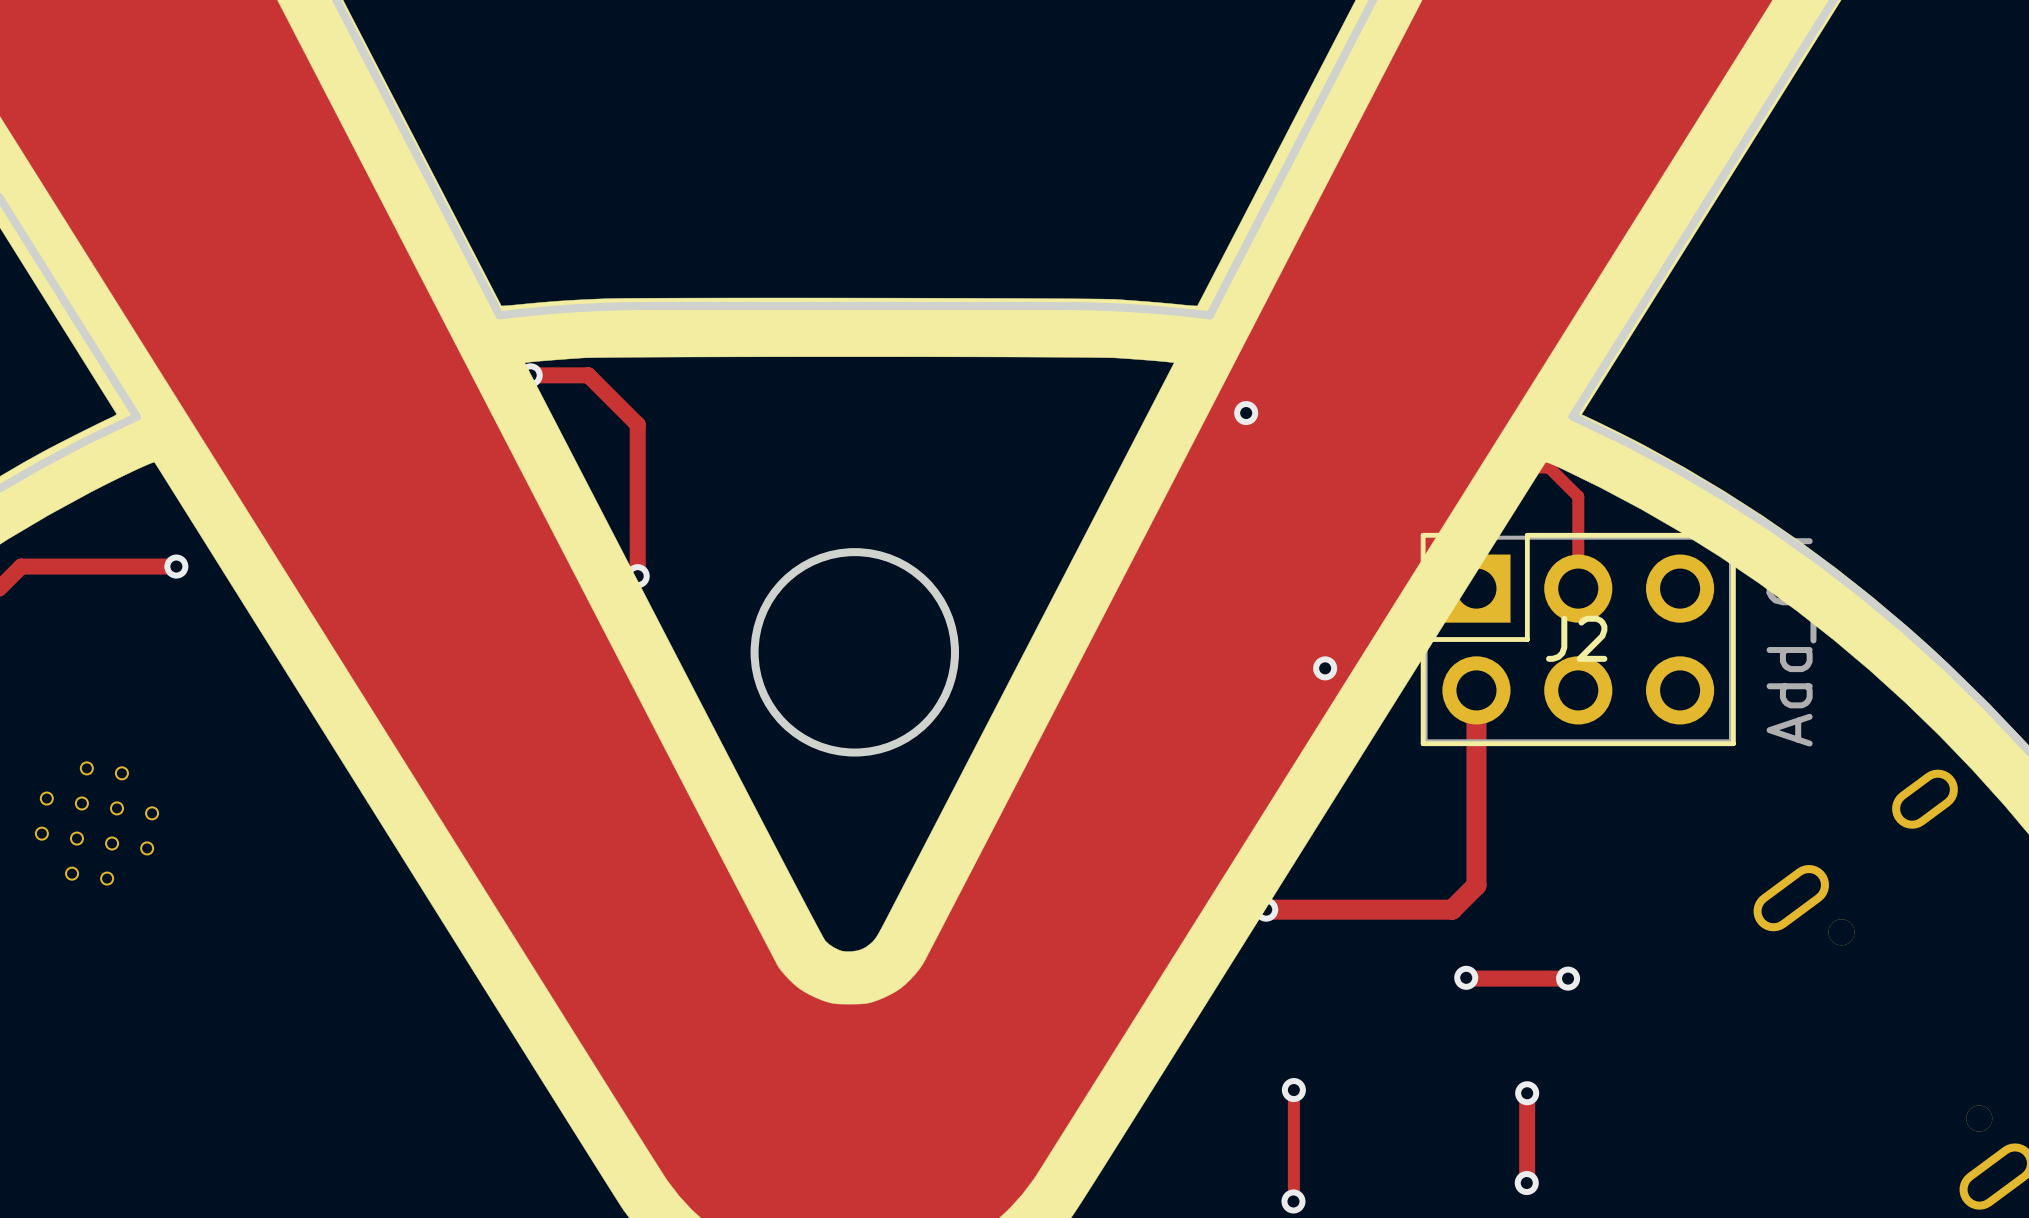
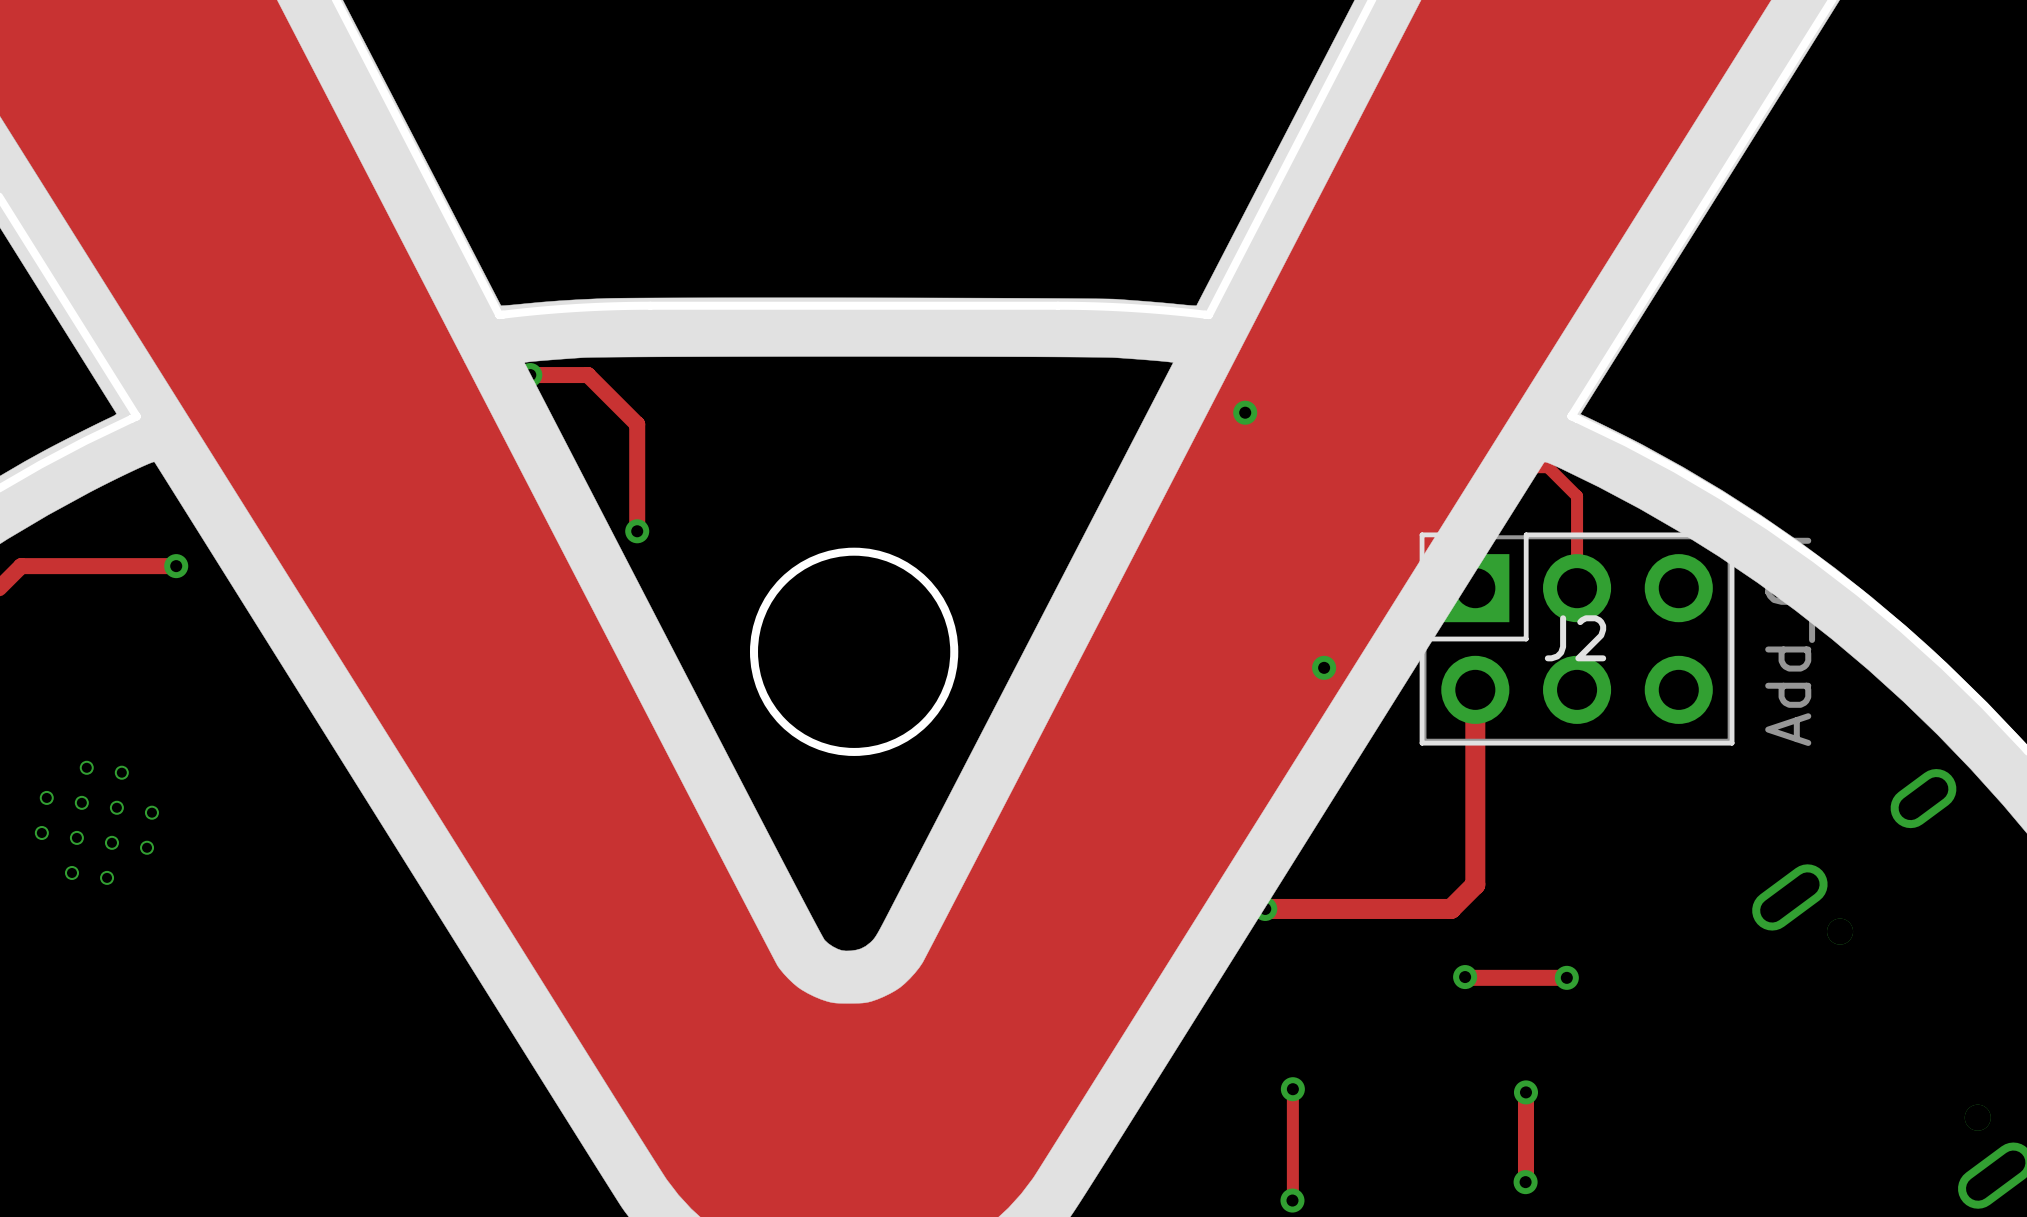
track: (637, 531) (637, 576) -> none
via position: (637, 576) -> (637, 531)

